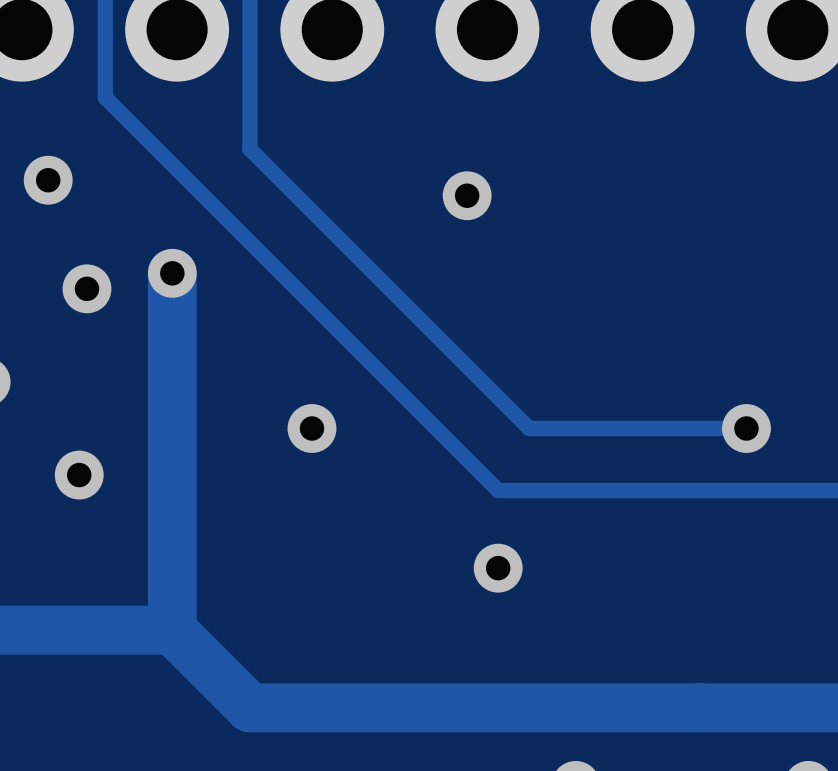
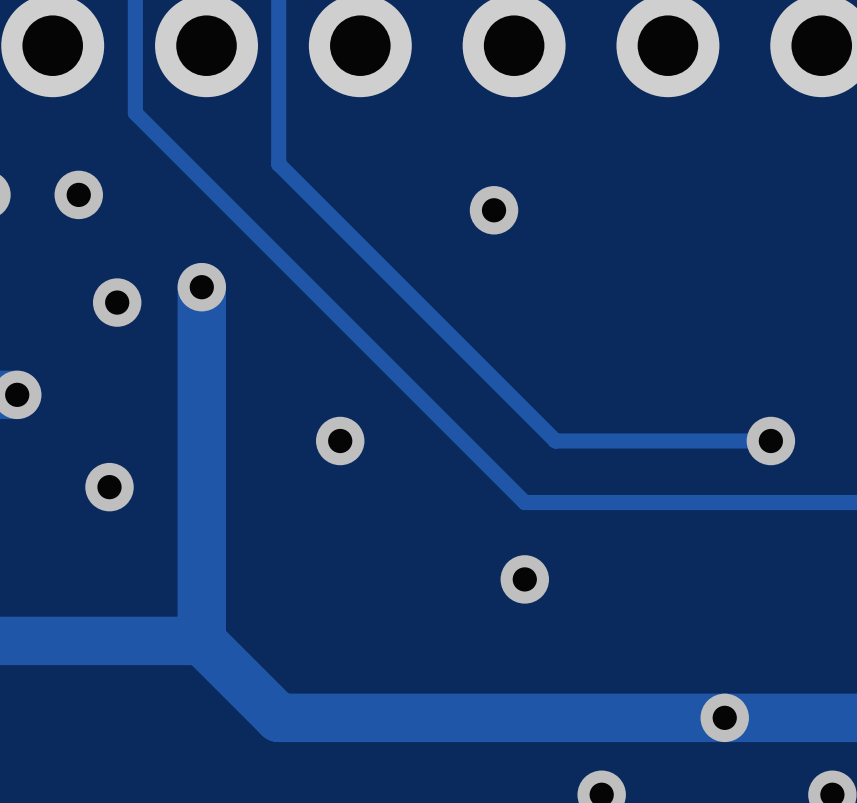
via: none -> (724, 717)

